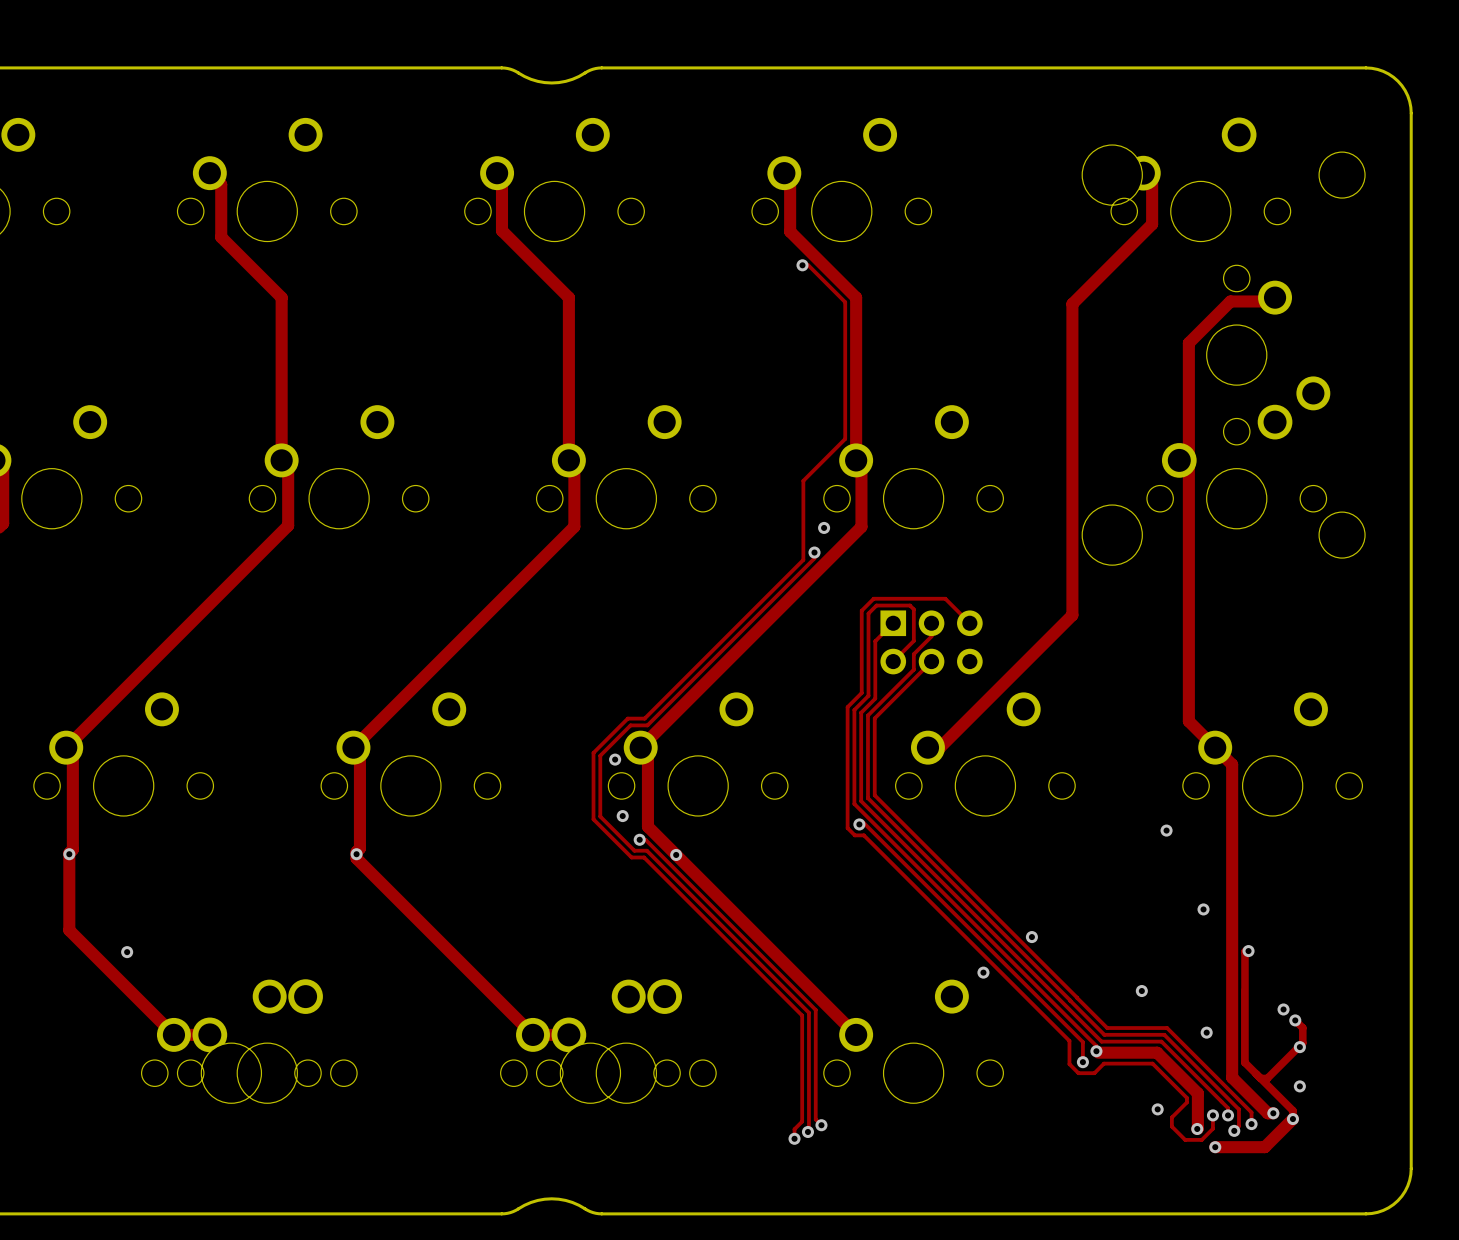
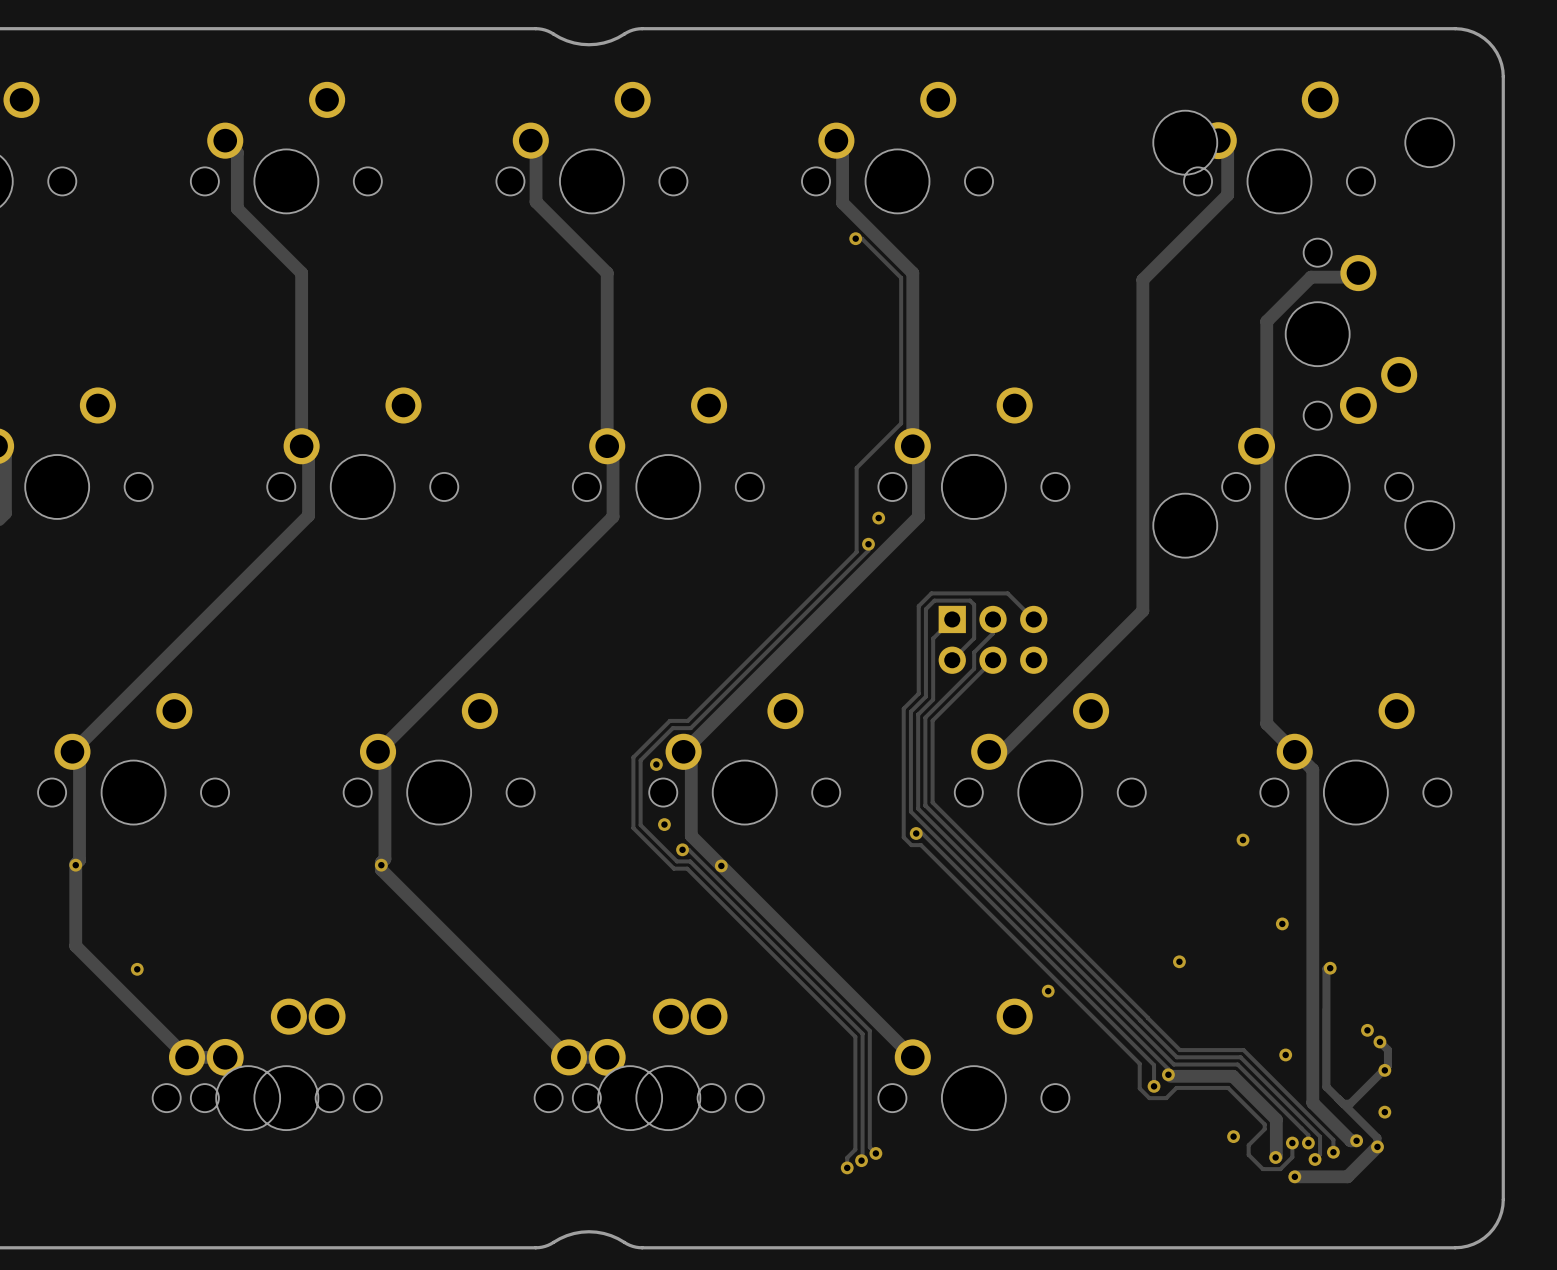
via: (1031, 937) -> none
via: none -> (1179, 961)
via: (1141, 991) -> none

